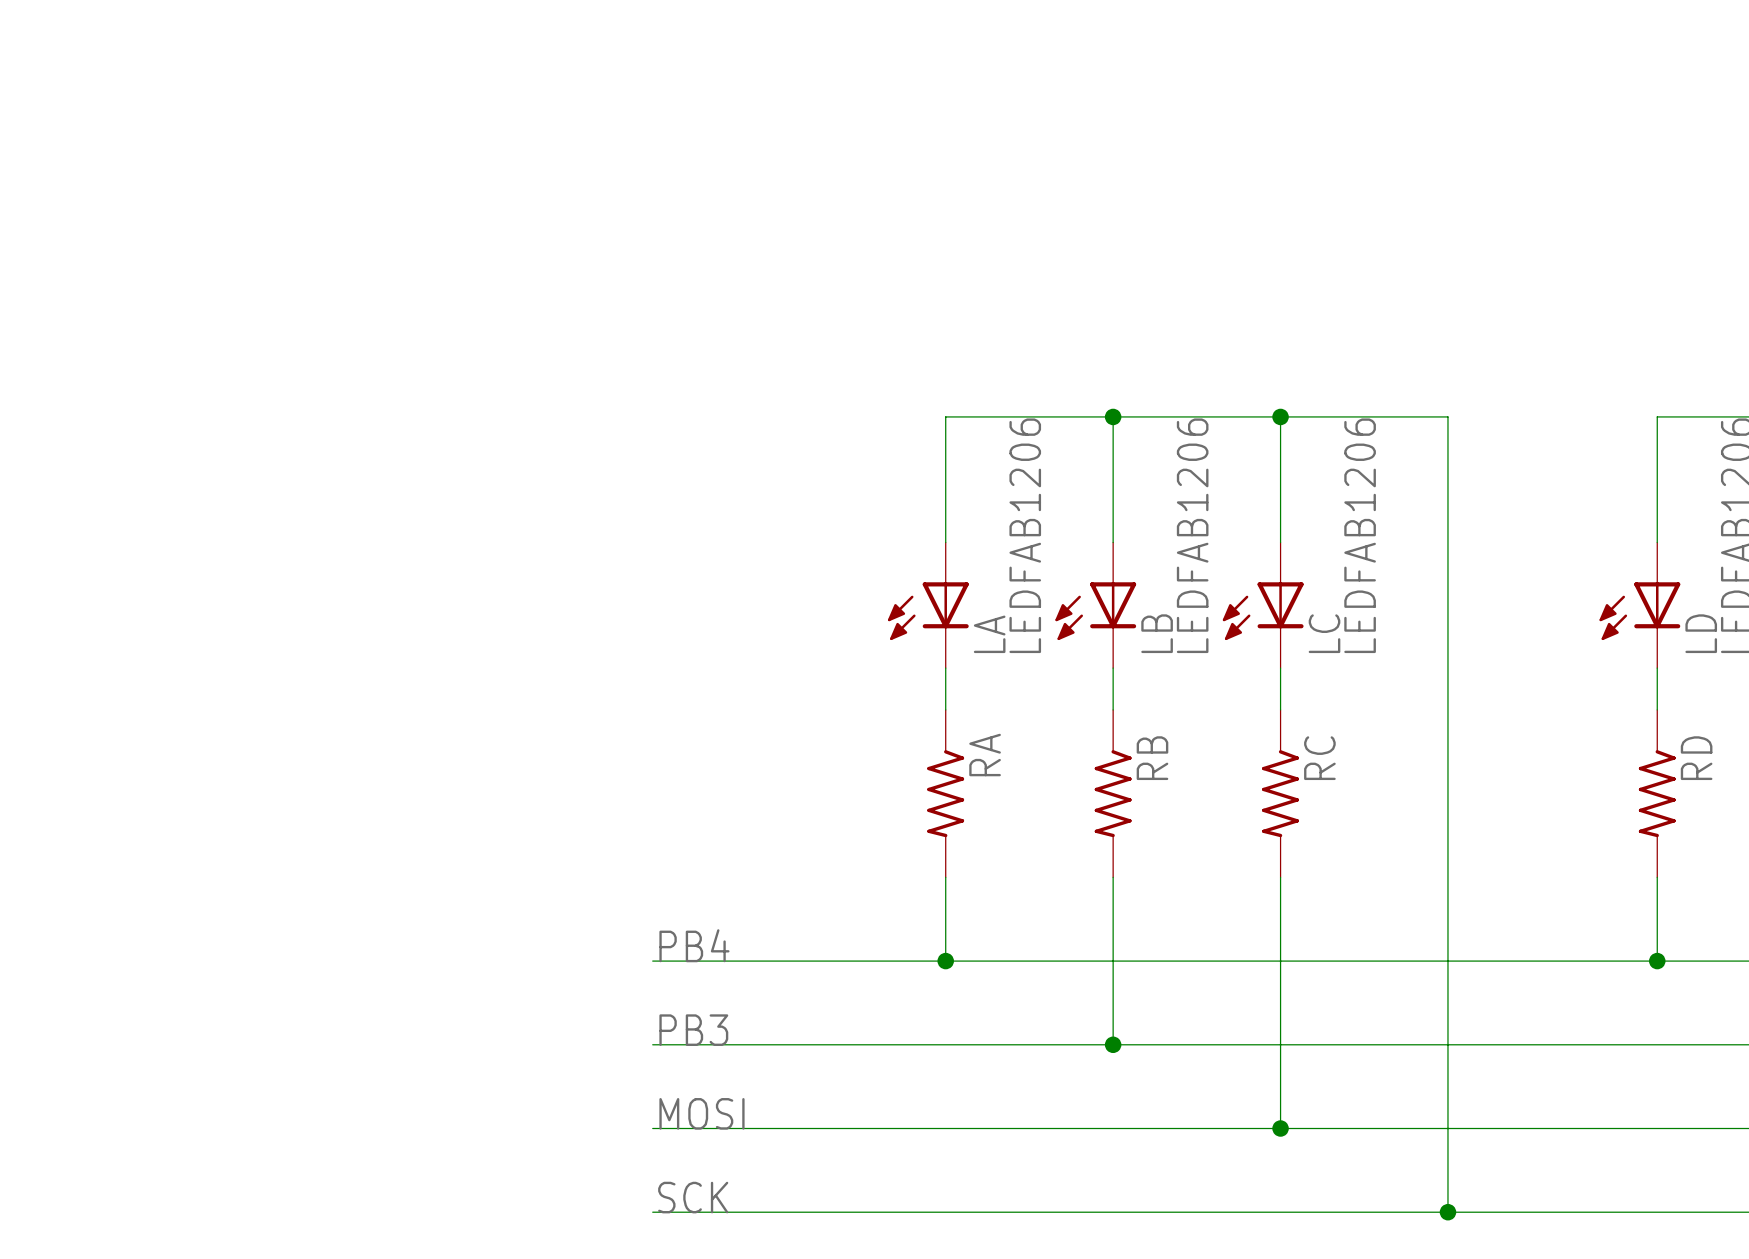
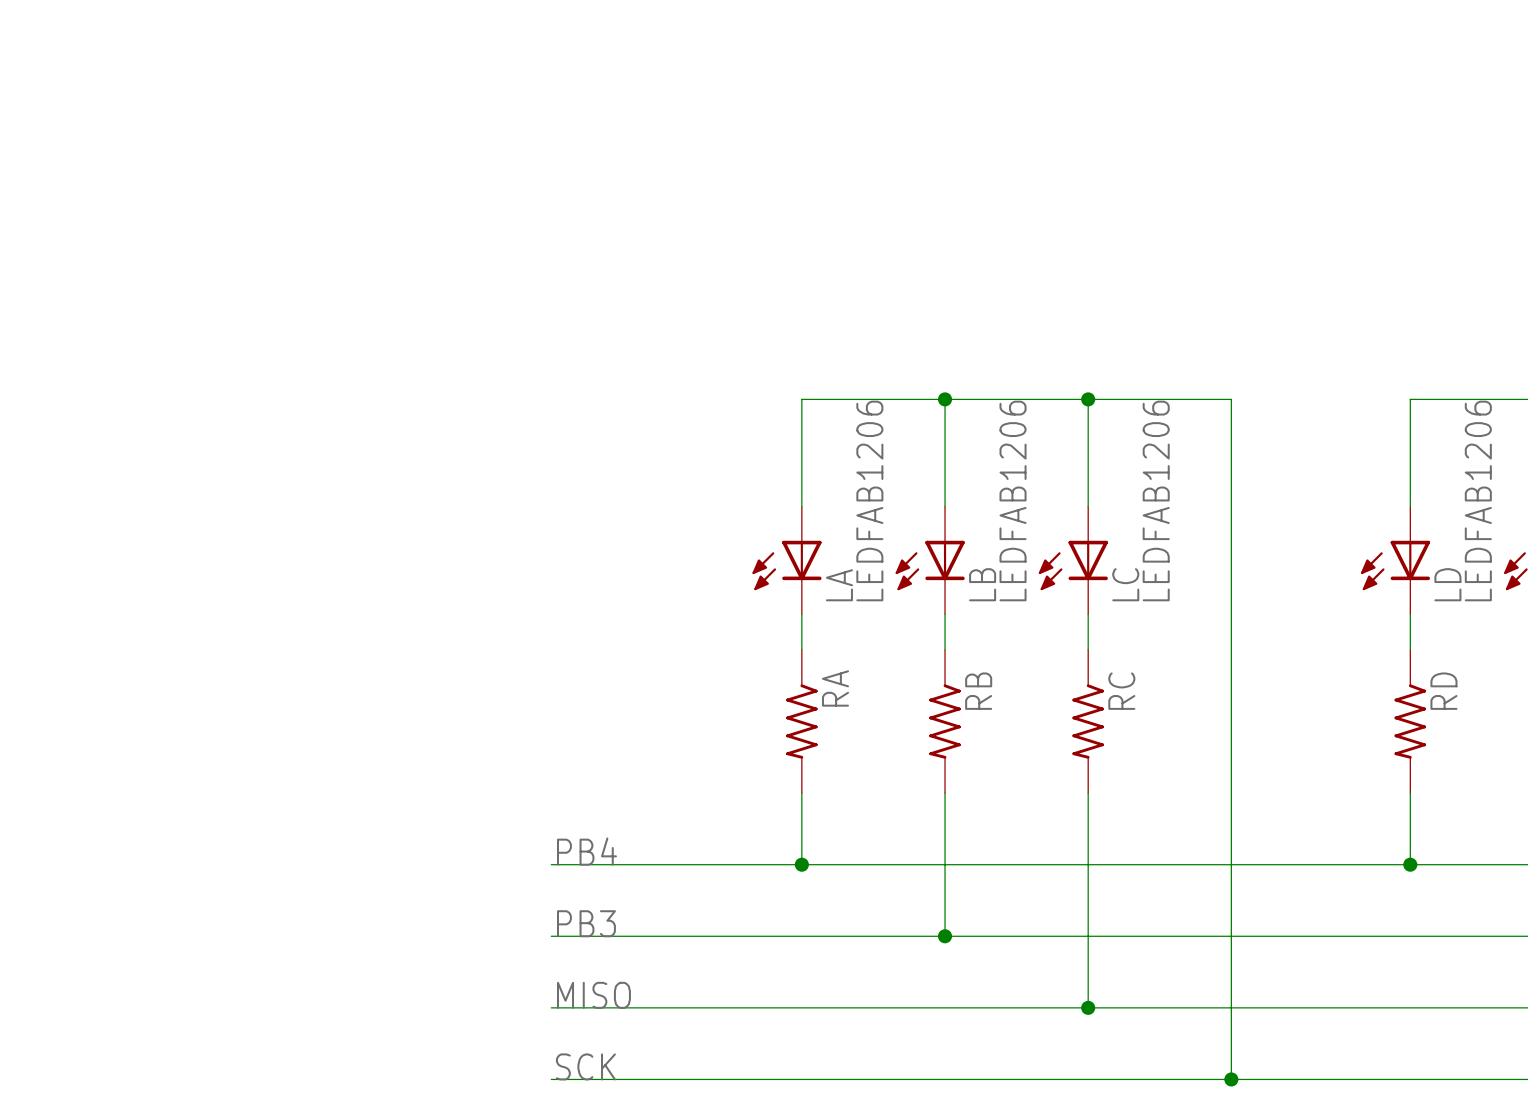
label: MOSI (701, 1113) -> MISO (593, 995)

